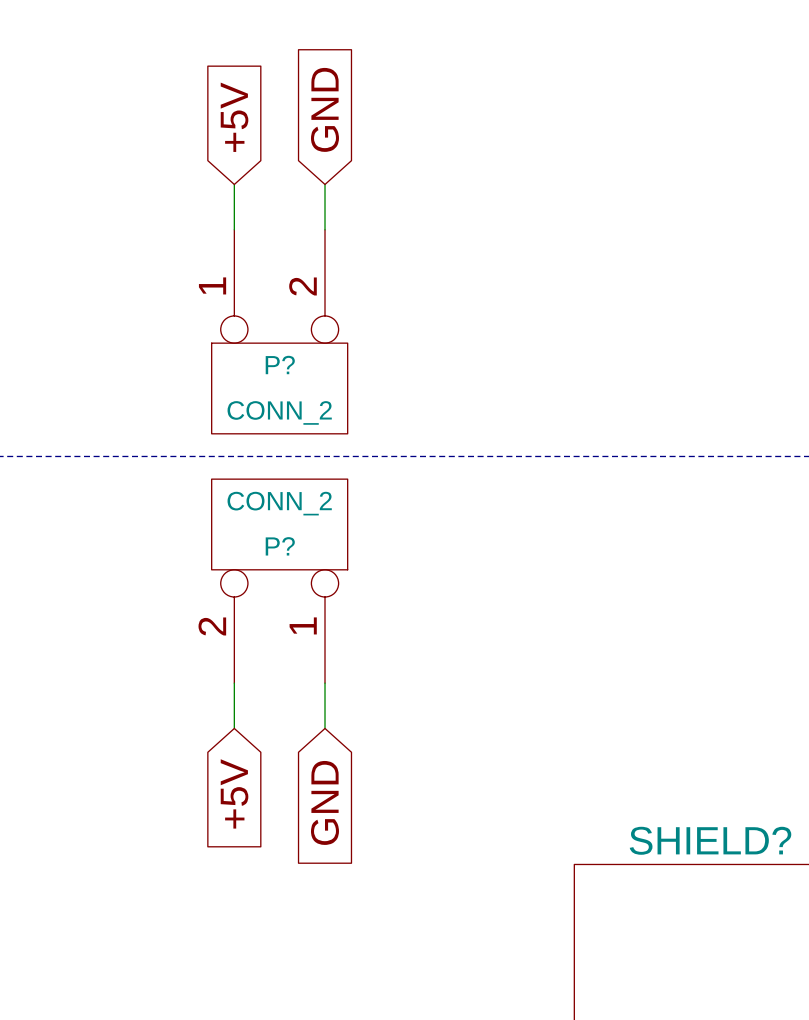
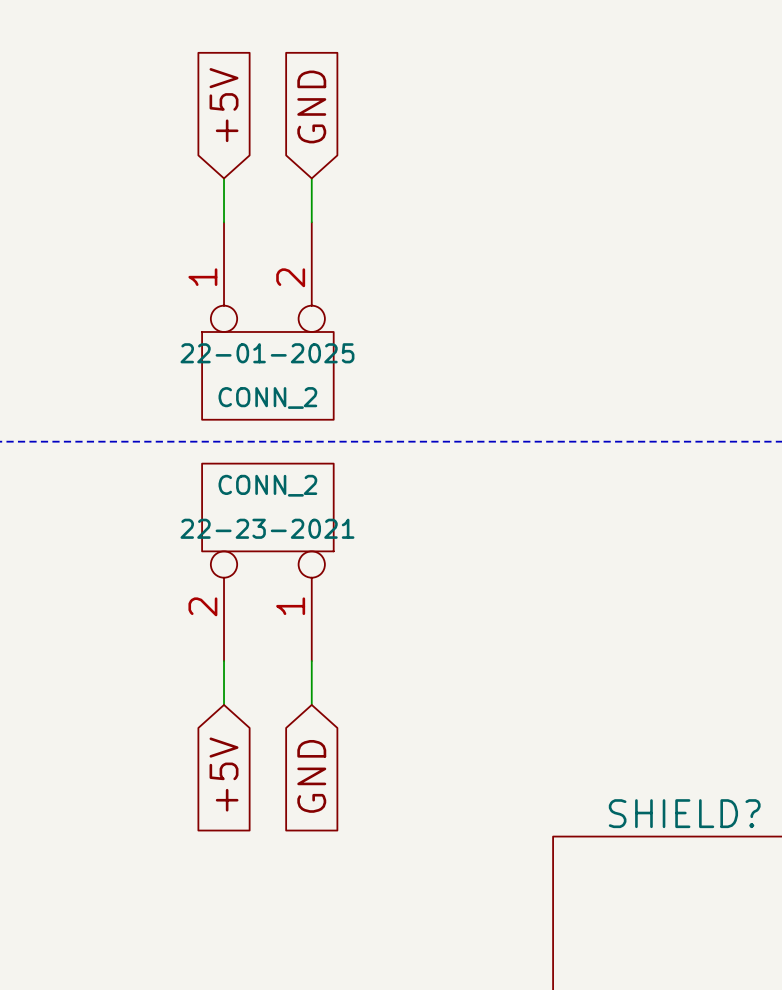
P? name: P? (280, 365) -> 22-01-2025 (267, 353)
P? name: P? (280, 546) -> 22-23-2021 (267, 528)

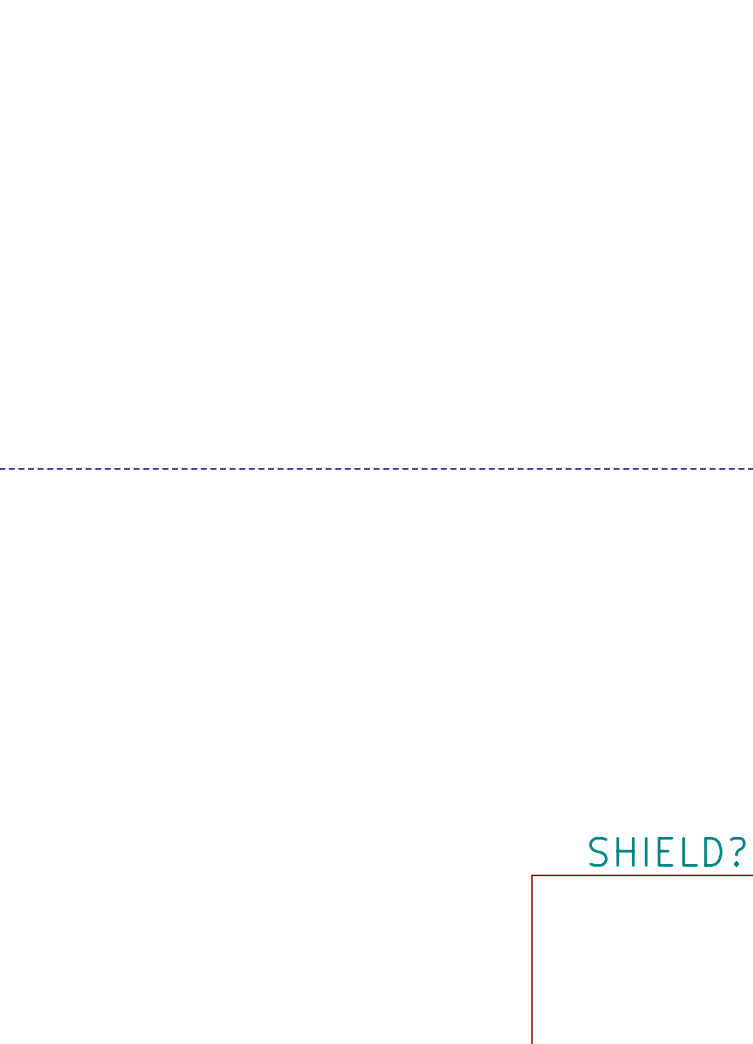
global label: +5V (224, 105) -> none
global label: GND (311, 106) -> none
wire: (224, 178) (224, 222) -> none
wire: (311, 178) (311, 222) -> none
22-01-2025: CONN_2 (267, 321) -> none
22-23-2021: CONN_2 (267, 562) -> none
wire: (224, 661) (224, 704) -> none
wire: (311, 661) (311, 704) -> none
global label: +5V (224, 774) -> none
global label: GND (311, 776) -> none

